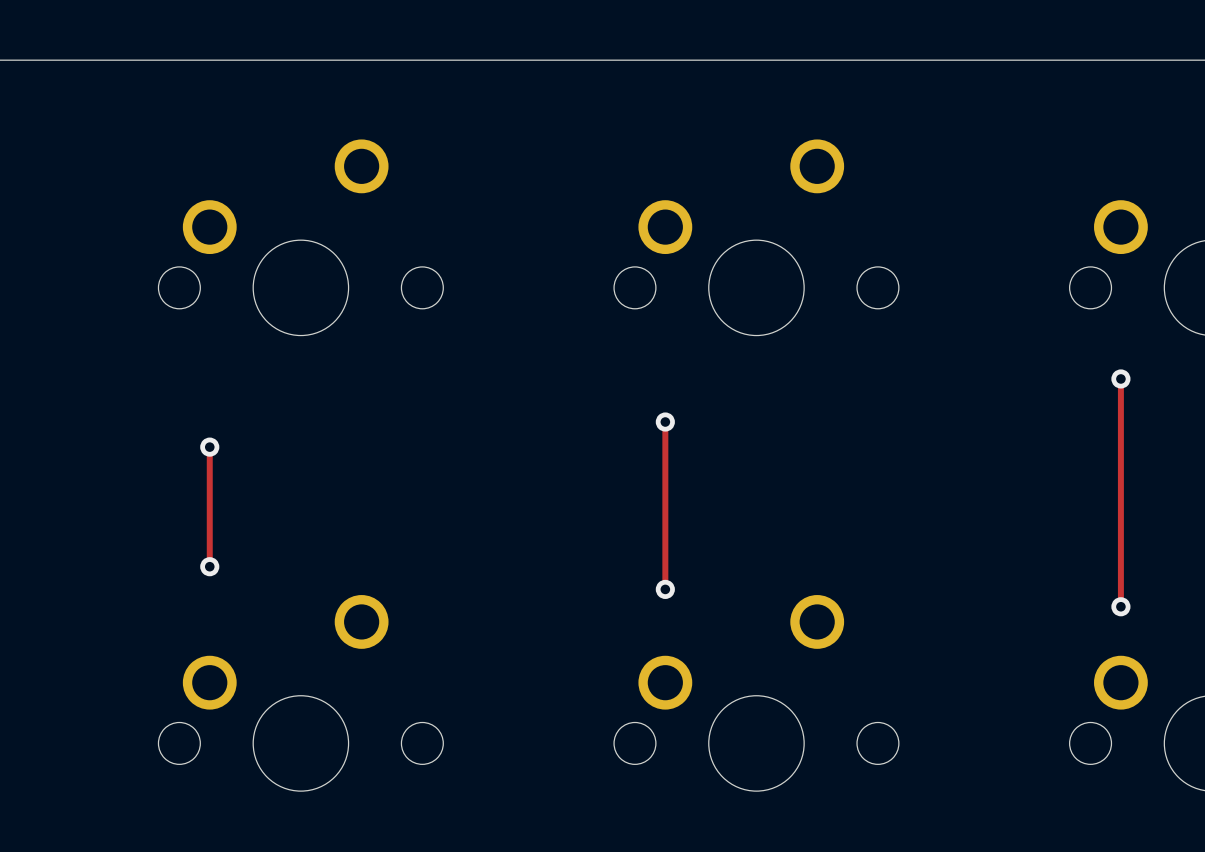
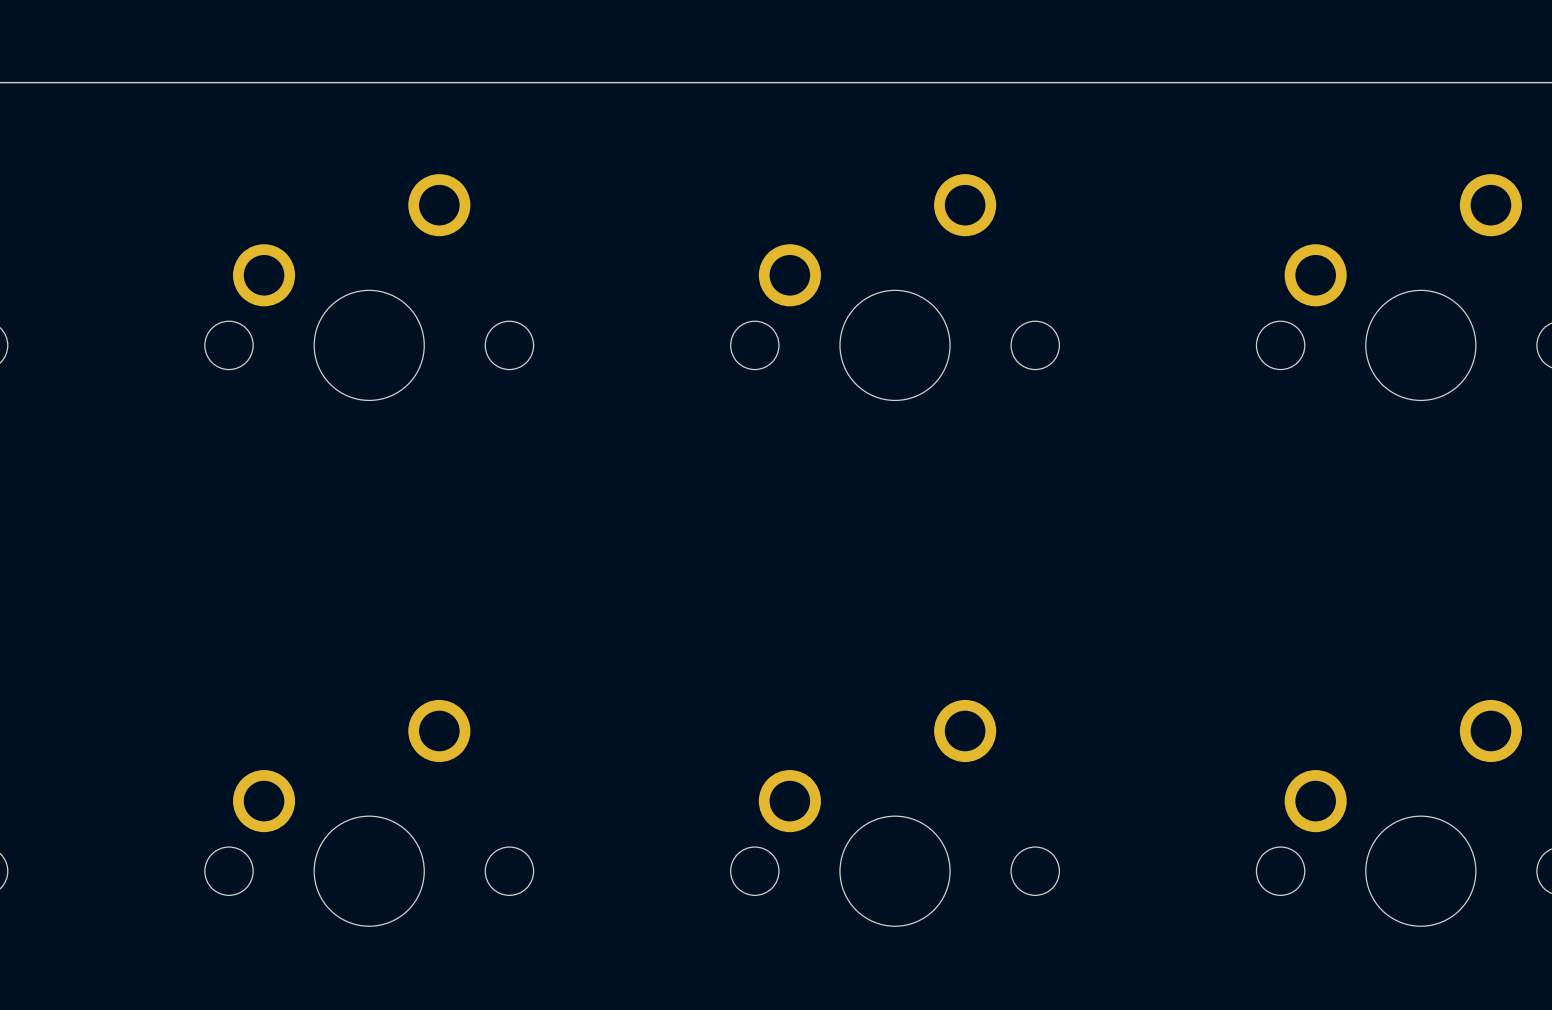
track: (1120, 378) (1120, 606) -> none
via: (1120, 378) -> none
track: (665, 422) (665, 589) -> none
via: (665, 422) -> none
track: (209, 447) (209, 566) -> none
via: (209, 447) -> none
via: (209, 566) -> none
via: (665, 589) -> none
via: (1120, 606) -> none

